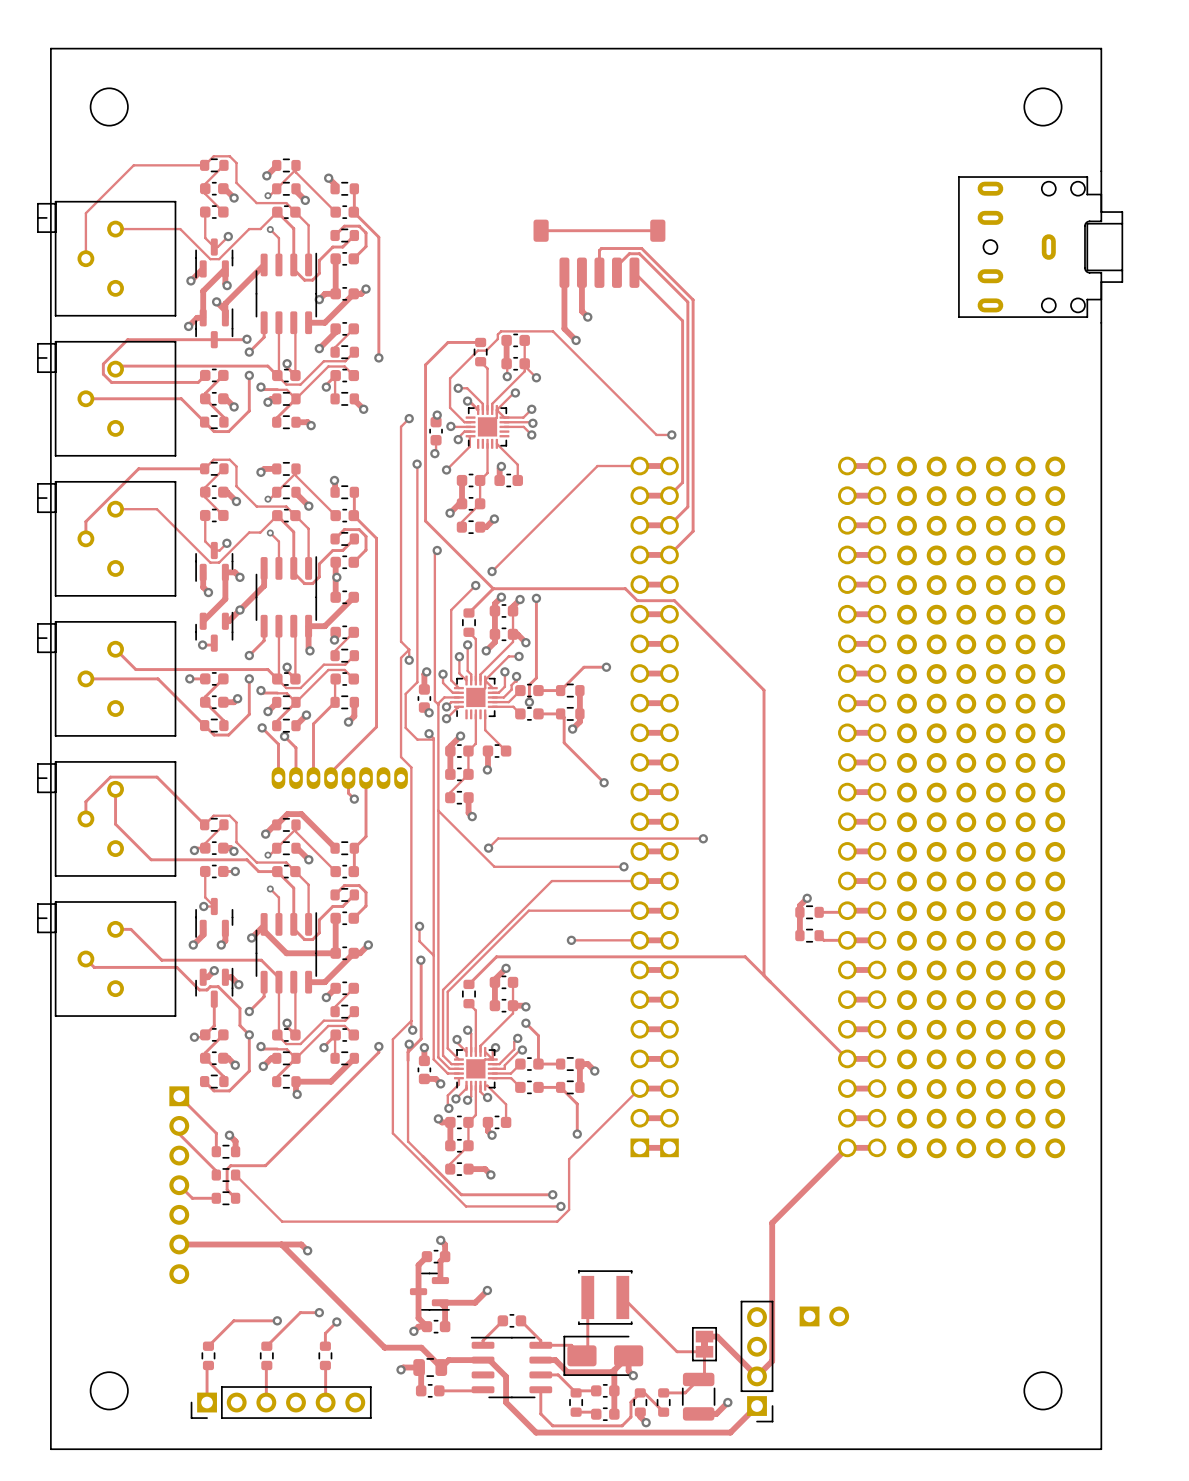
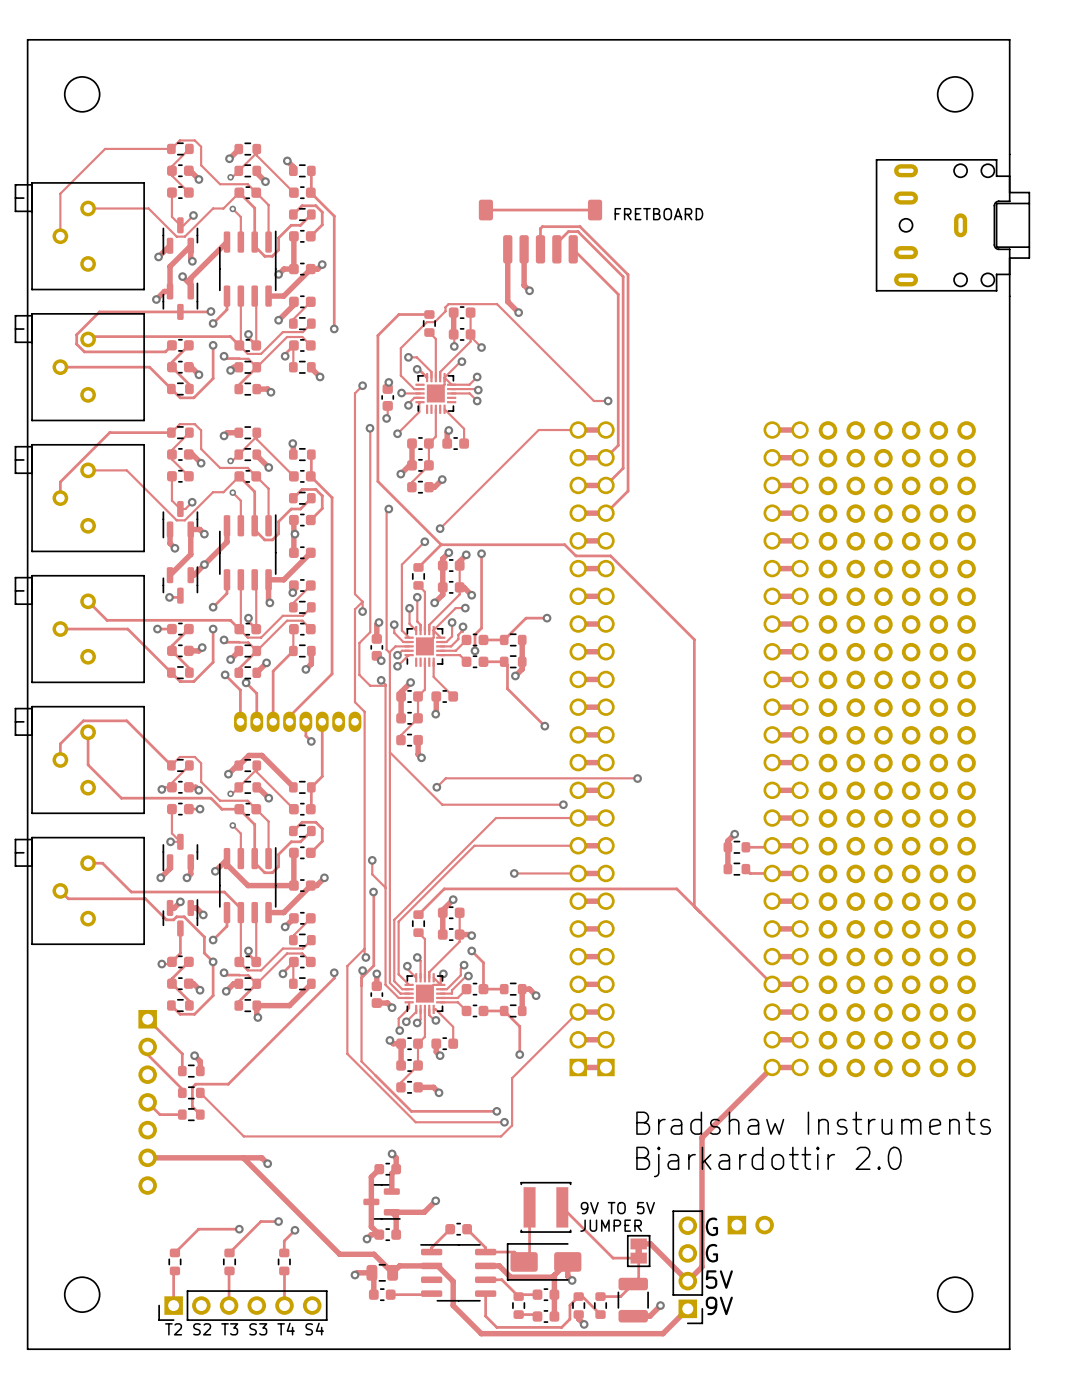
text: none -> FRETBOARD (658, 214)
text: none -> Bradshaw Instruments (813, 1123)
text: none -> Bjarkardottir 2.0 (768, 1161)
text: none -> 9V TO 5V (617, 1208)
text: none -> JUMPER (611, 1225)
text: none -> G (711, 1226)
text: none -> G (711, 1253)
text: none -> 5V (719, 1279)
text: none -> 9V (719, 1305)
text: none -> T2 S2 T3 S3 T4 S4 (244, 1329)

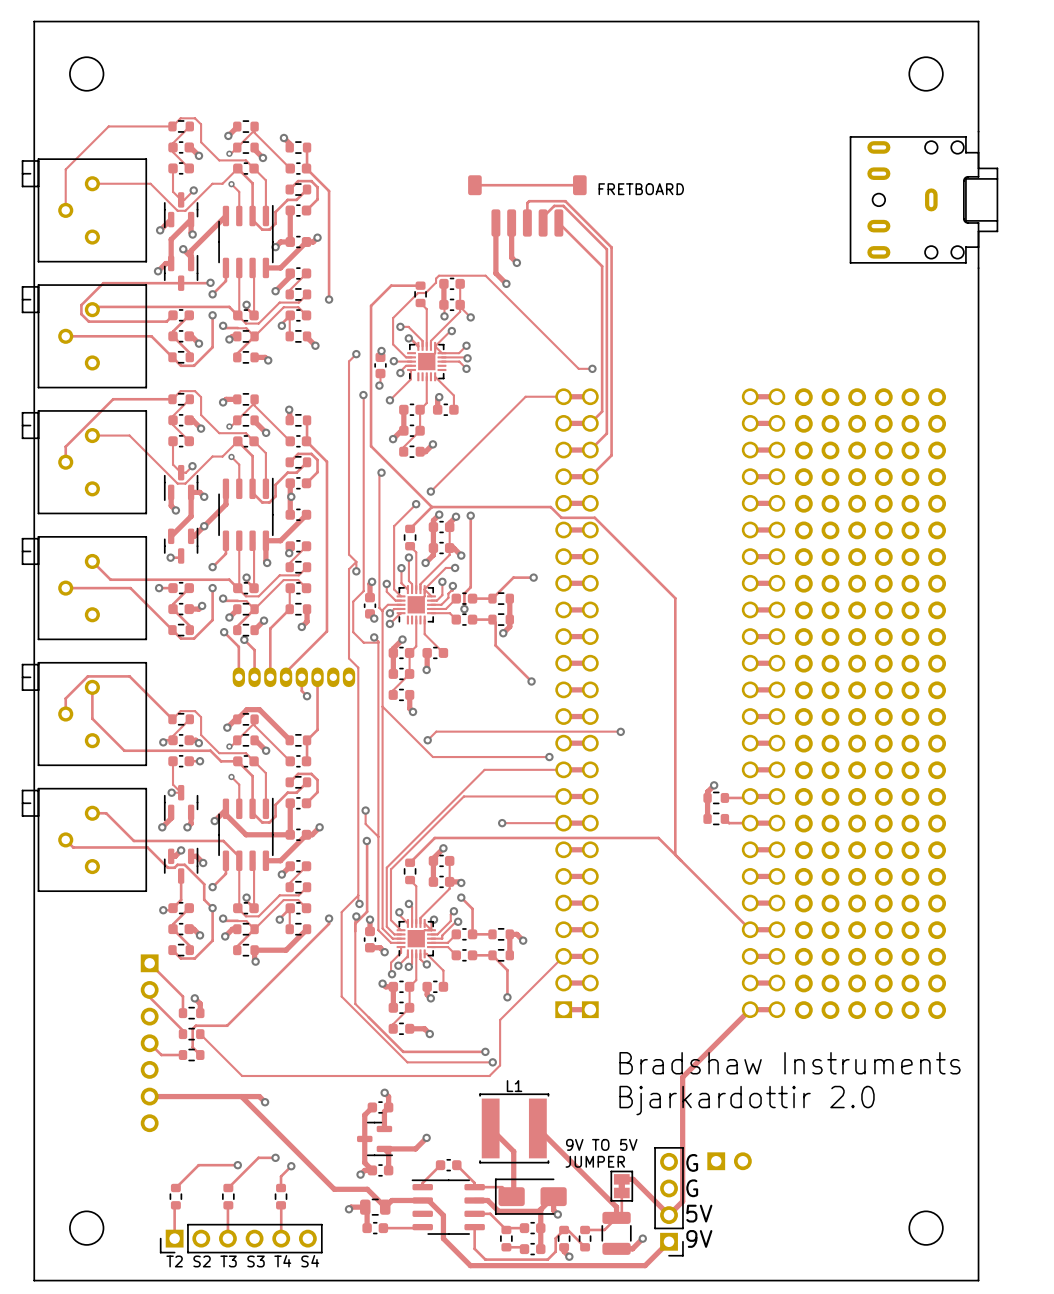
track: none -> (490, 1128) (513, 1151) (513, 1194) (511, 1196)
L1: none -> (514, 1128)
track: none -> (537, 1128) (616, 1207) (616, 1217)
track: (529, 1207) (529, 1256) -> none
part: (545, 1207) -> none
track: (562, 1207) (613, 1258) (638, 1258) -> none

